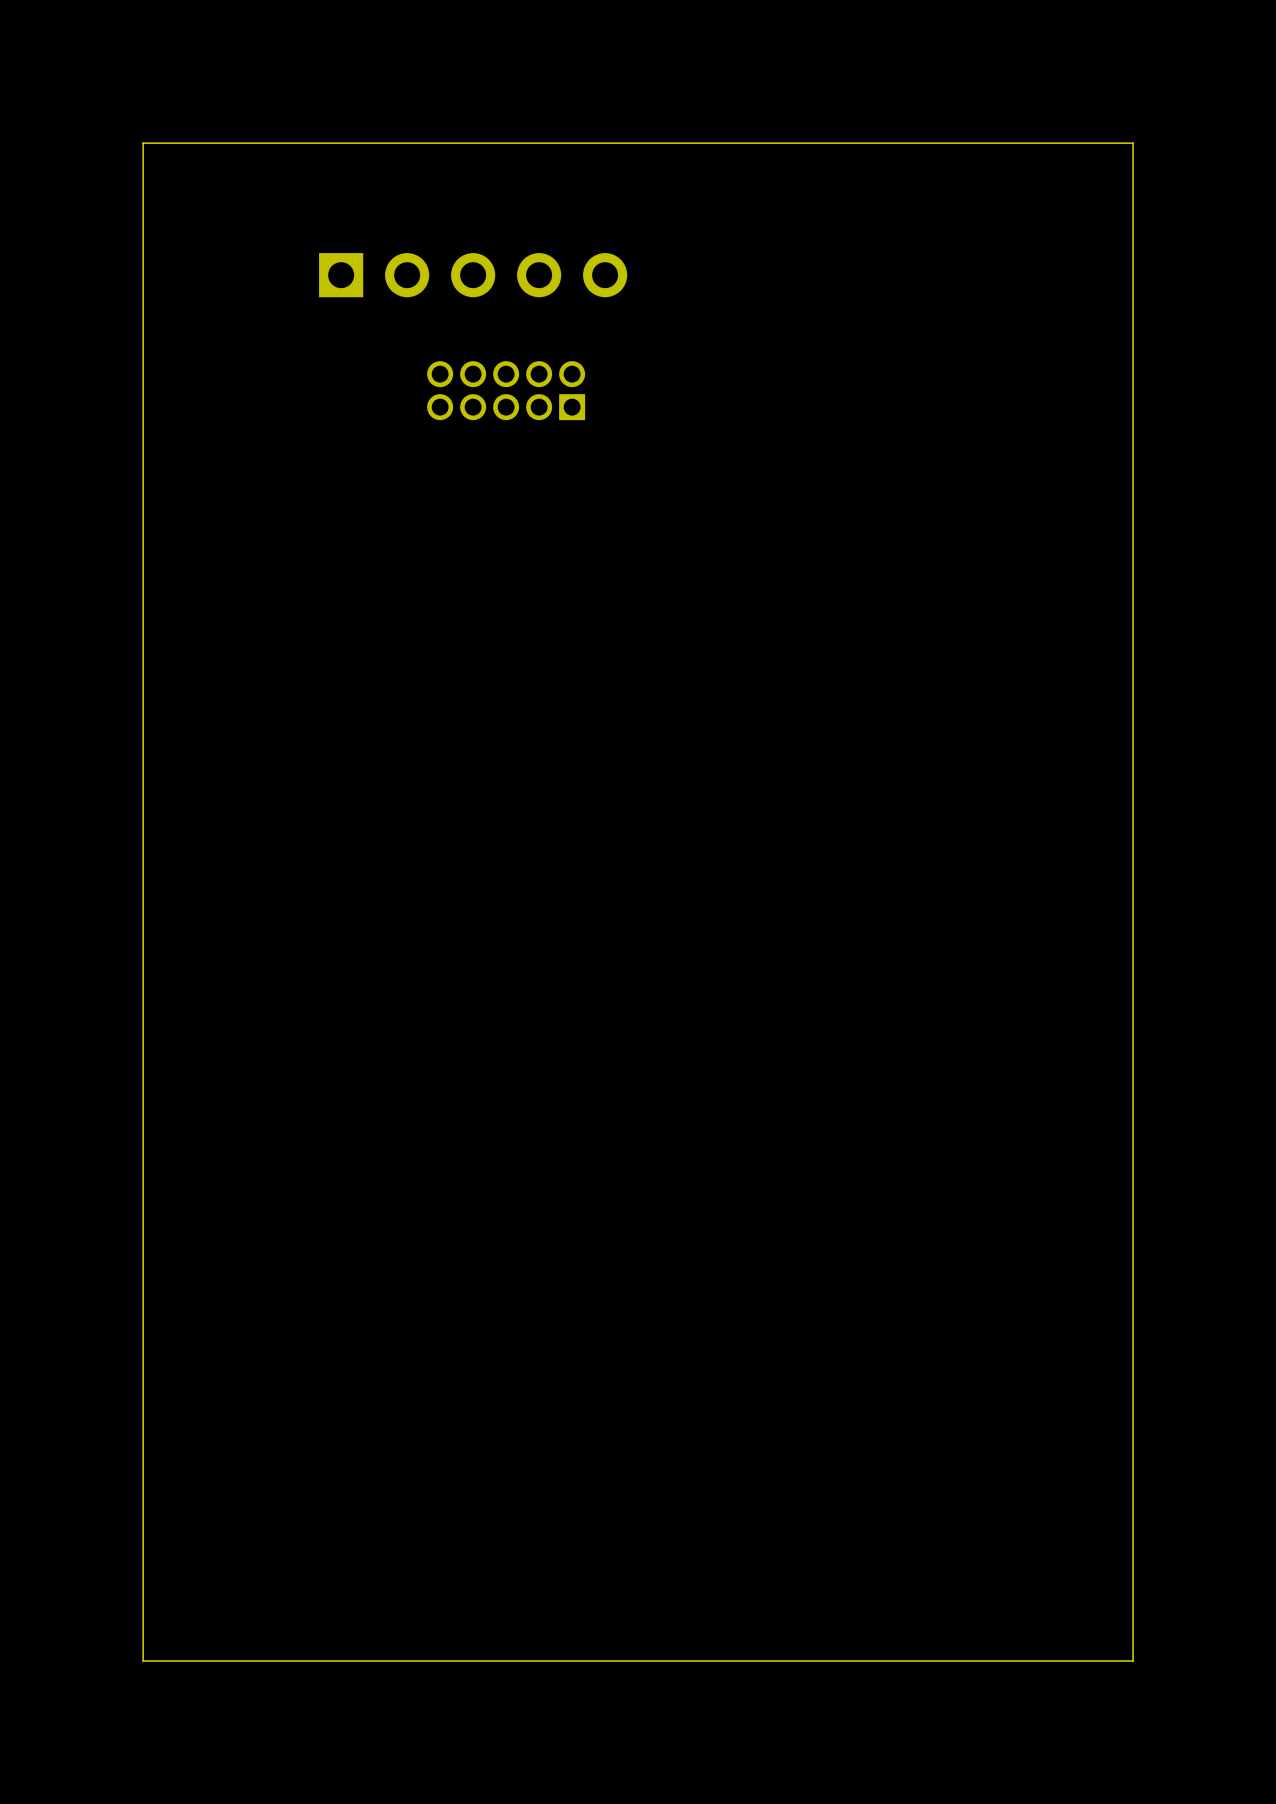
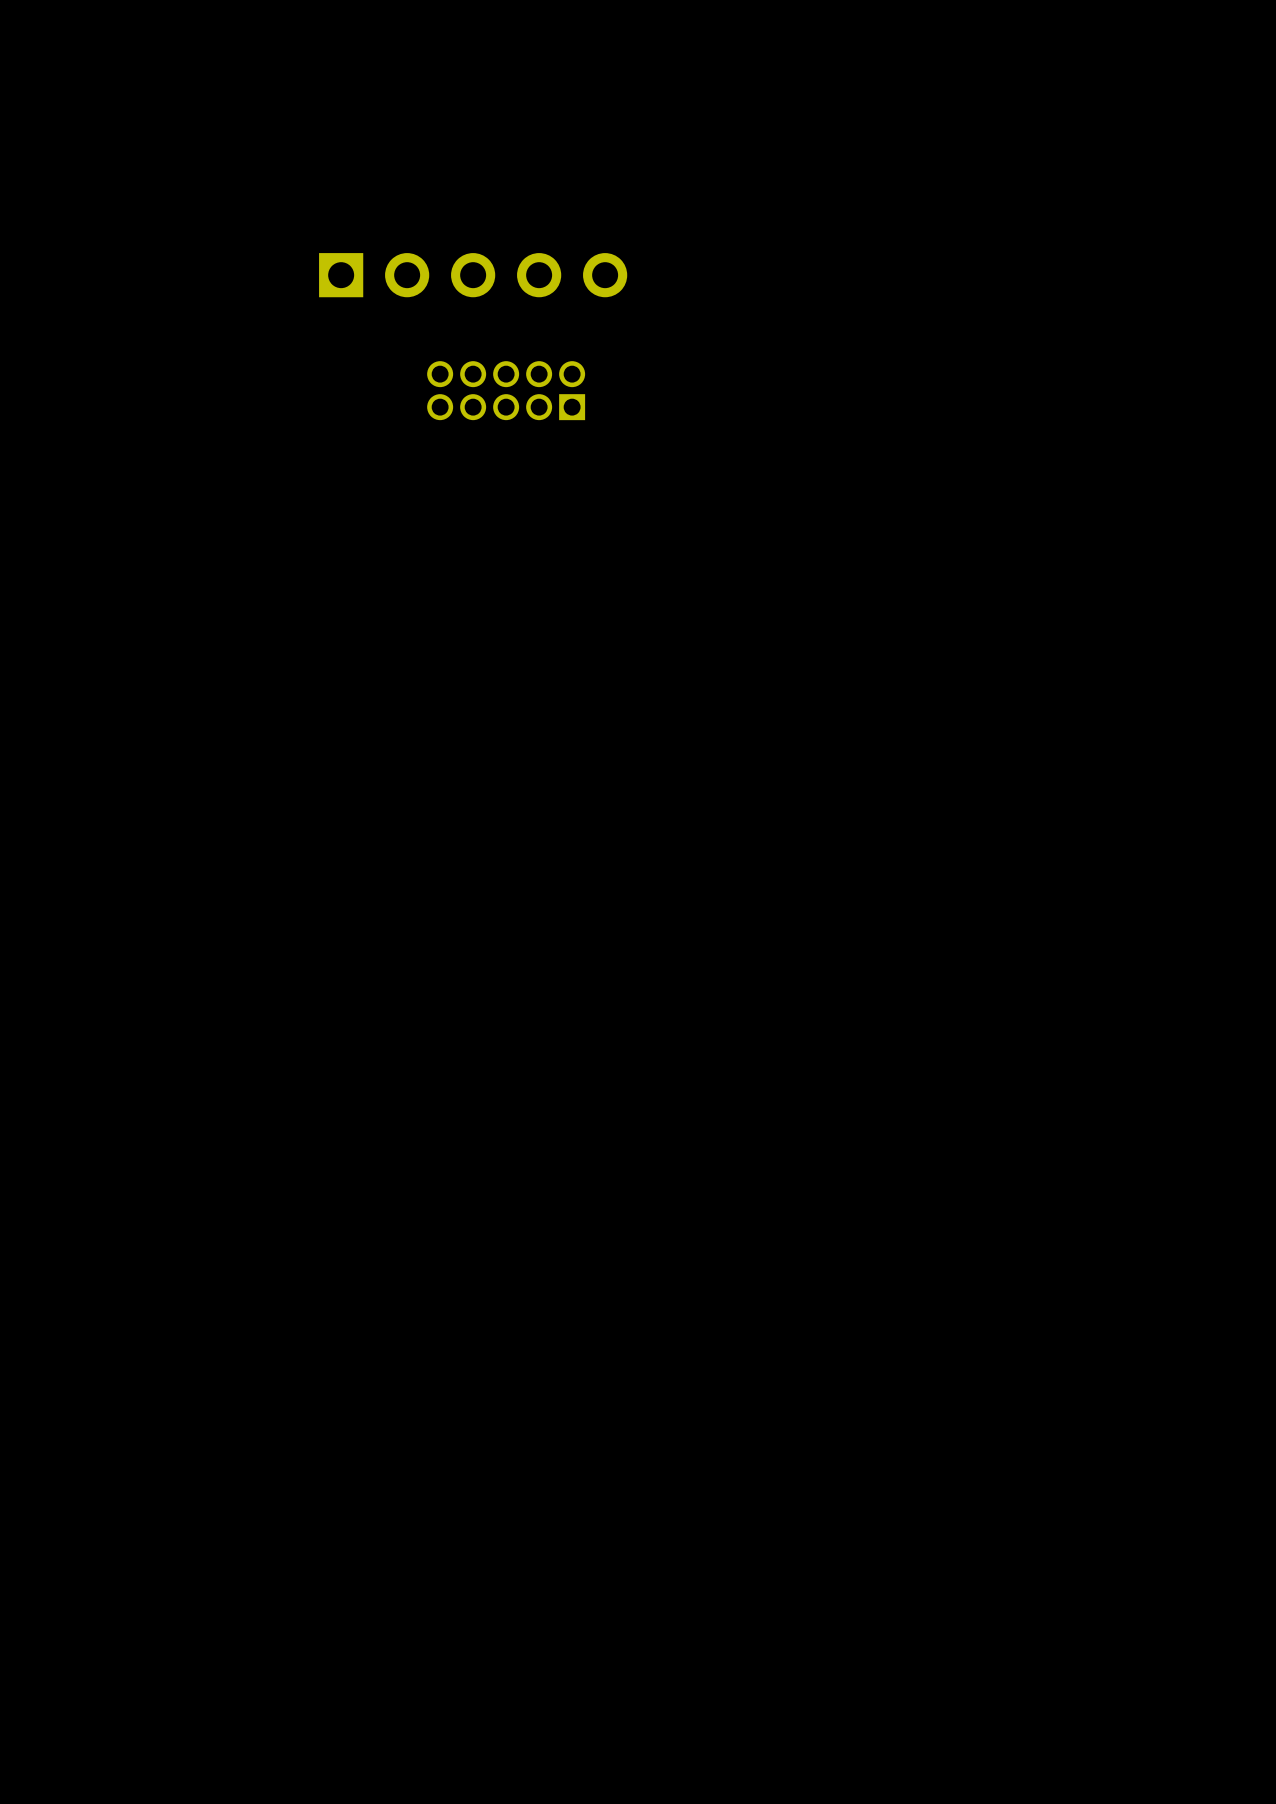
board edge: (1133, 143) (143, 143) (143, 1660) (1133, 1660) (1133, 143) -> none

